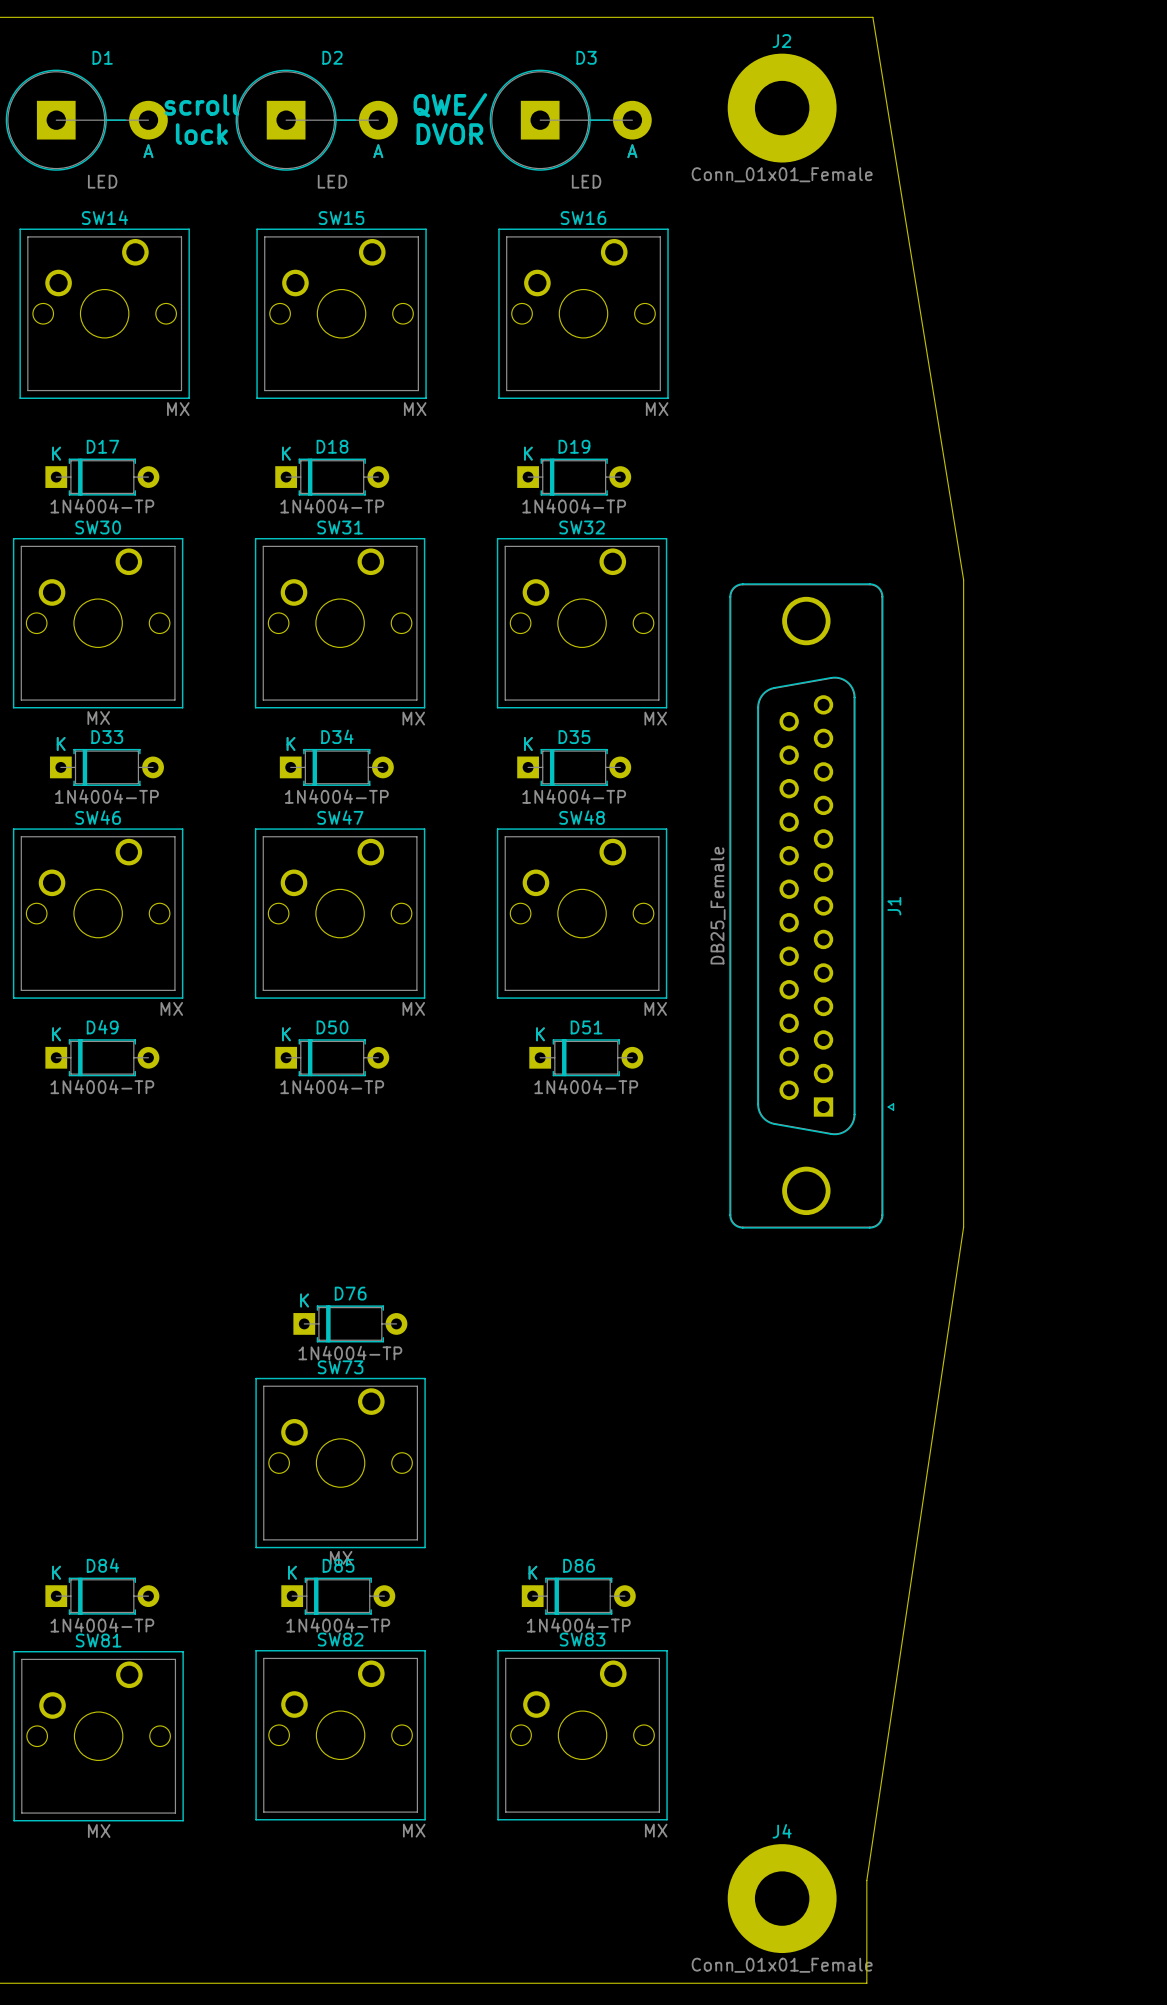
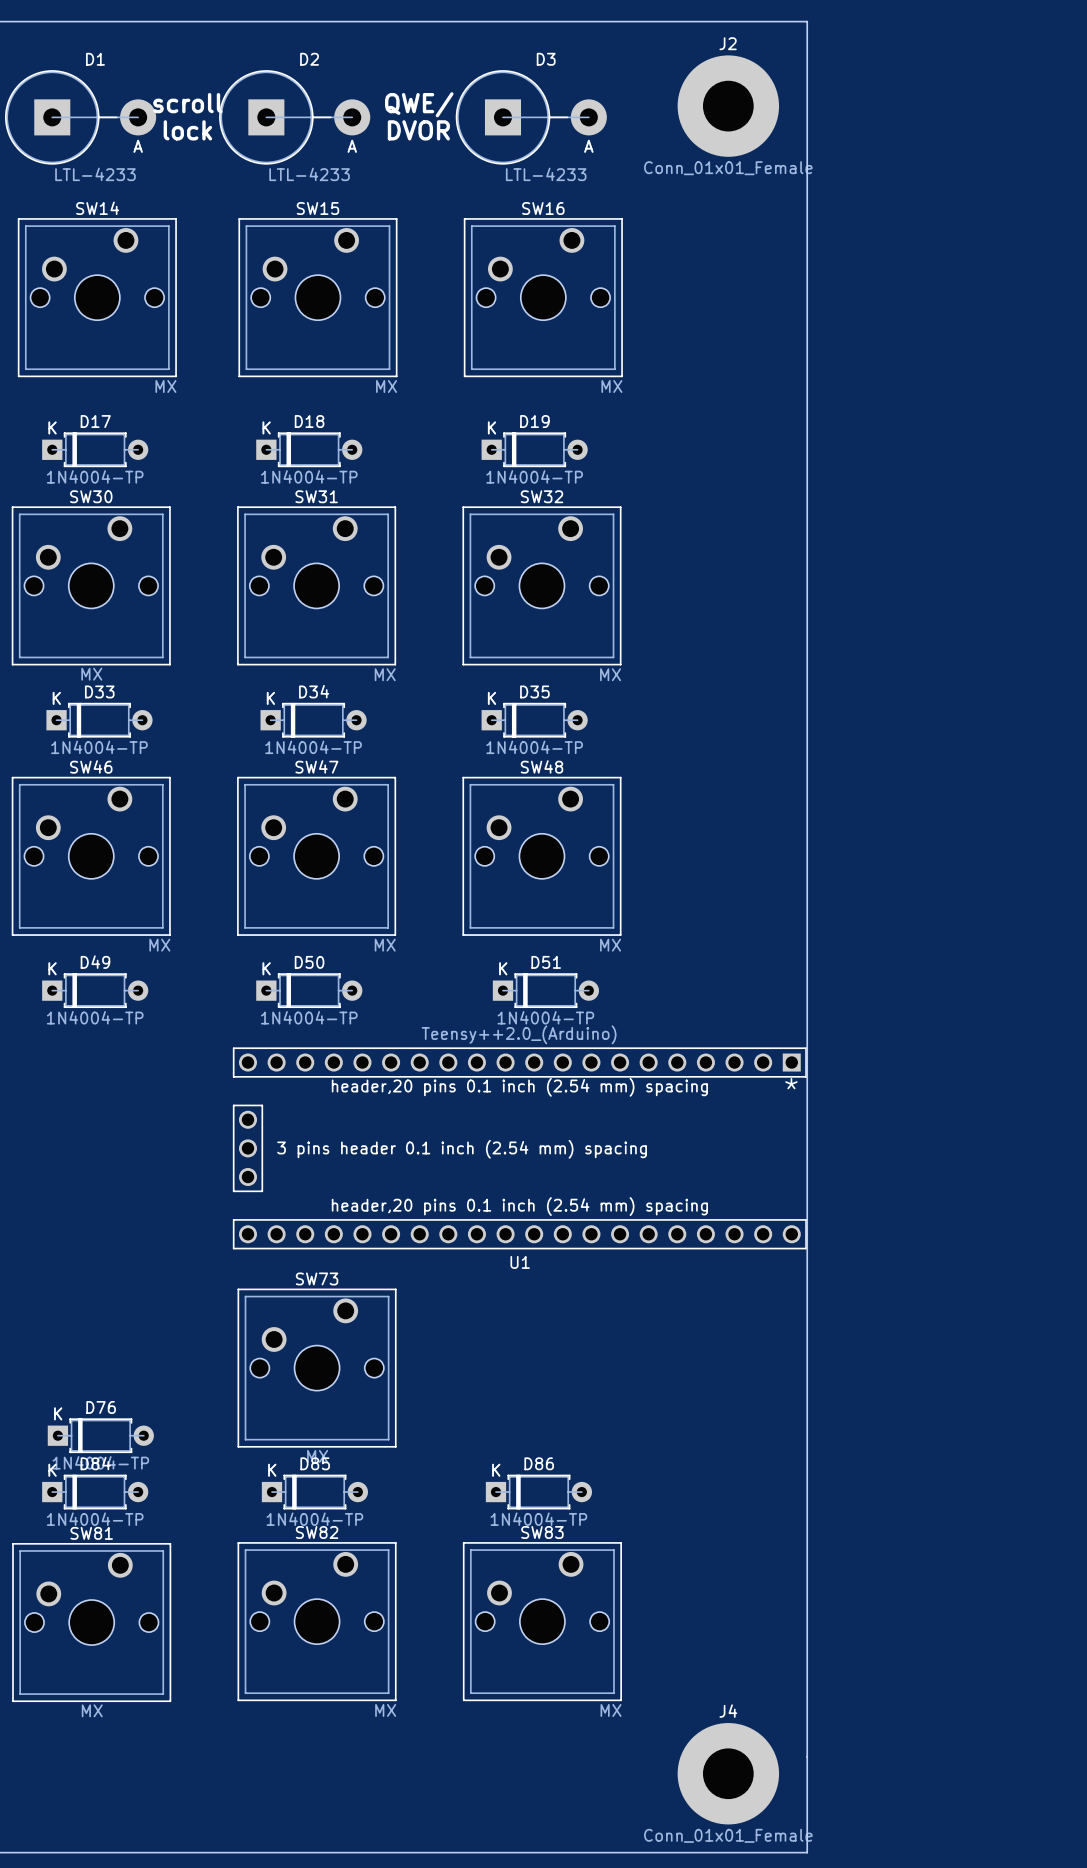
board edge: (866, 17) (872, 17) (963, 579) (963, 1227) (866, 1880) -> (807, 21) (807, 1756)
D1 value: LED (102, 181) -> LTL-4233 (95, 174)
D2 value: LED (332, 181) -> LTL-4233 (309, 174)
D3 value: LED (586, 181) -> LTL-4233 (546, 174)
J1: DB25_Female (811, 905) -> none
text: none -> * (791, 1083)
U1: none -> Teensy++2.0_(Arduino) (519, 1148)
D76 position: (350, 1323) -> (100, 1435)

